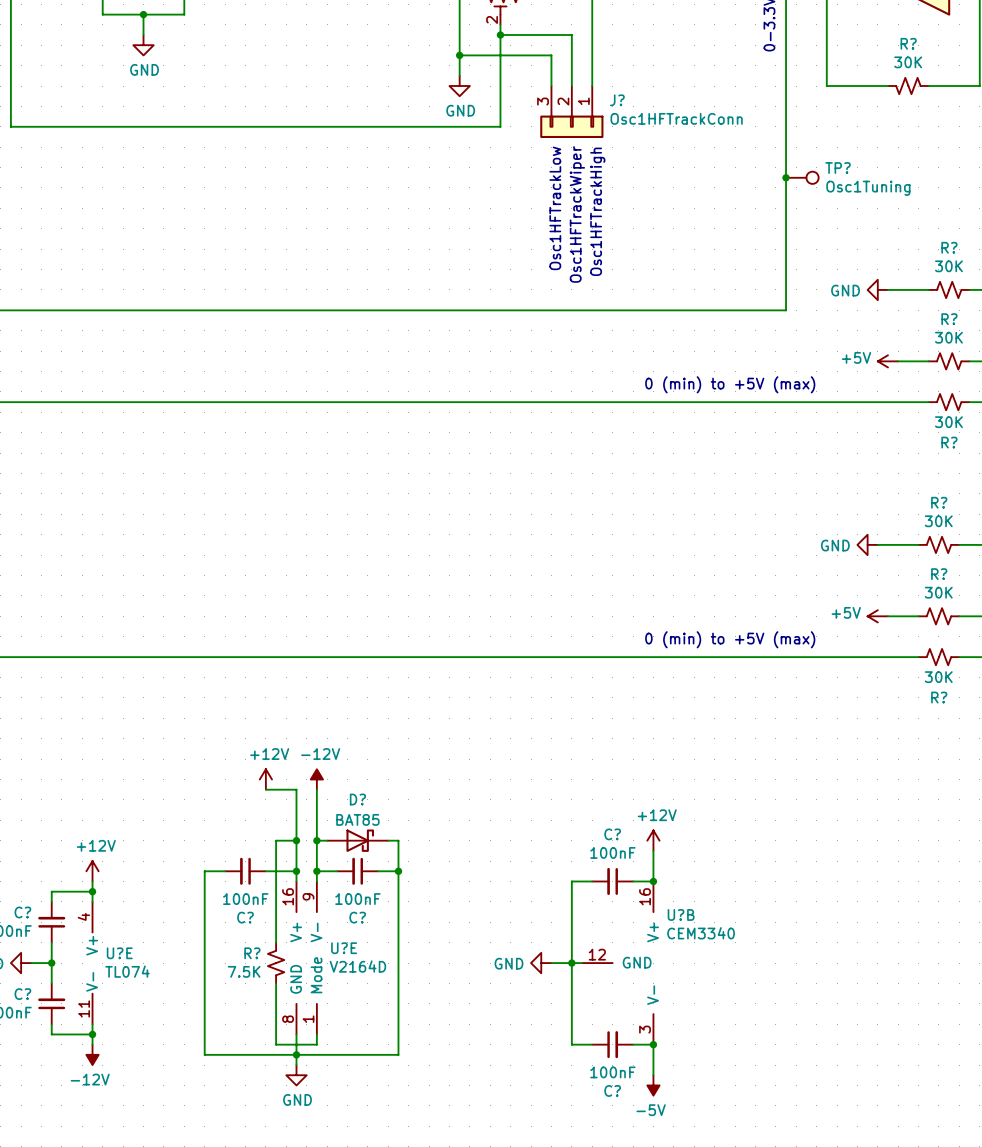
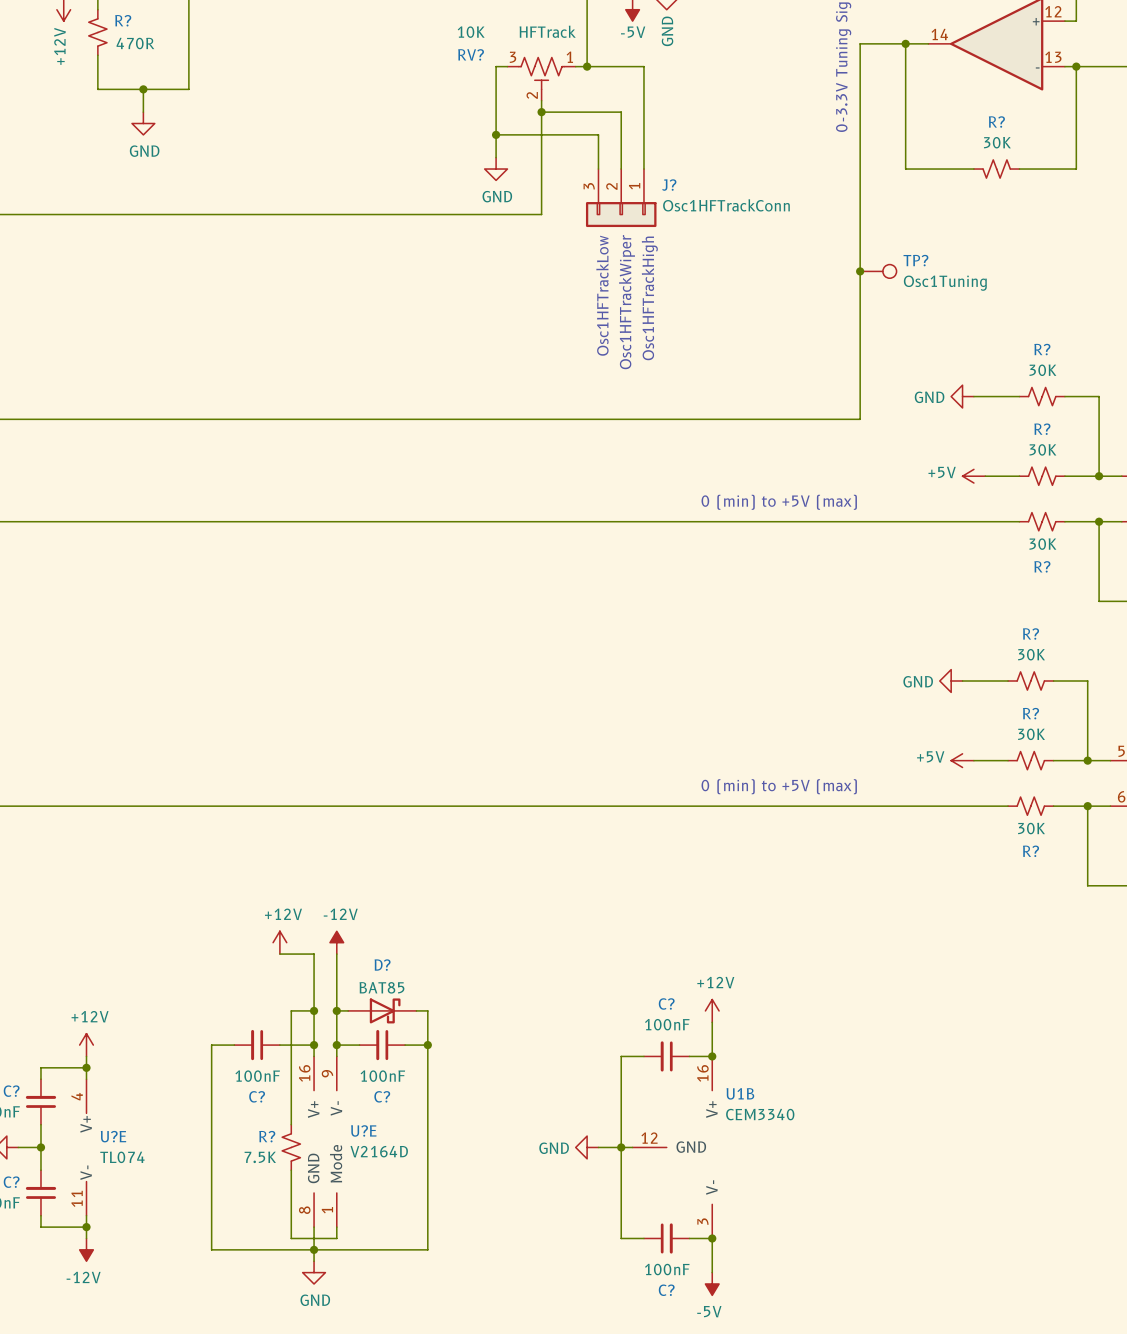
U?B name: U?B (681, 914) -> U1B (740, 1093)

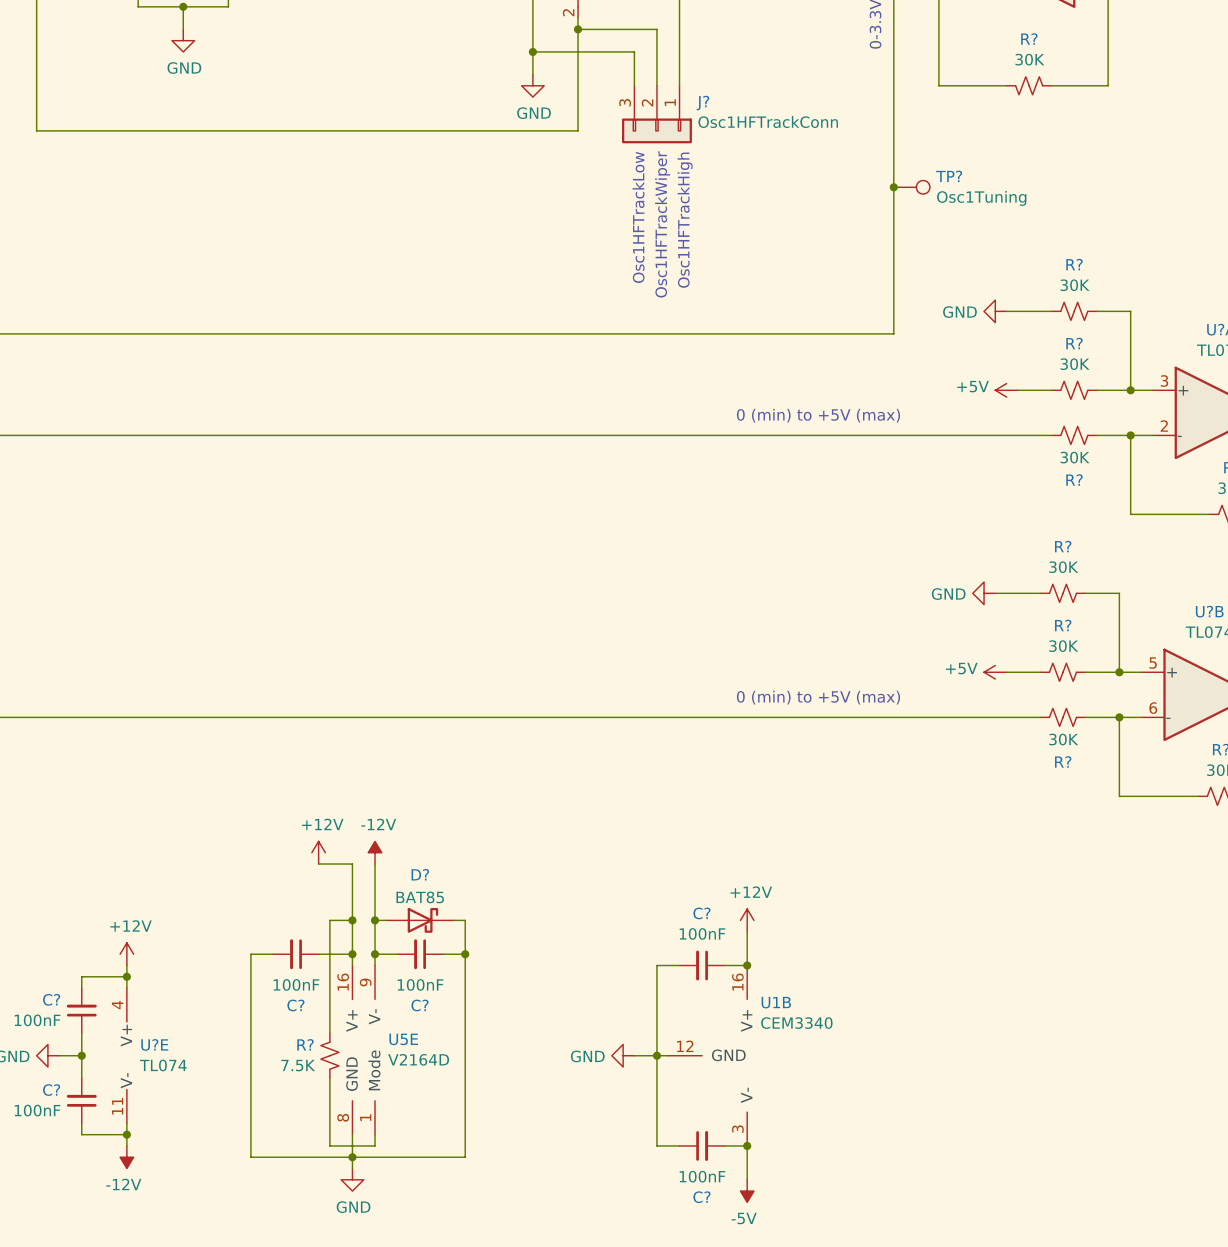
U?E name: U?E (363, 1130) -> U5E (403, 1039)

